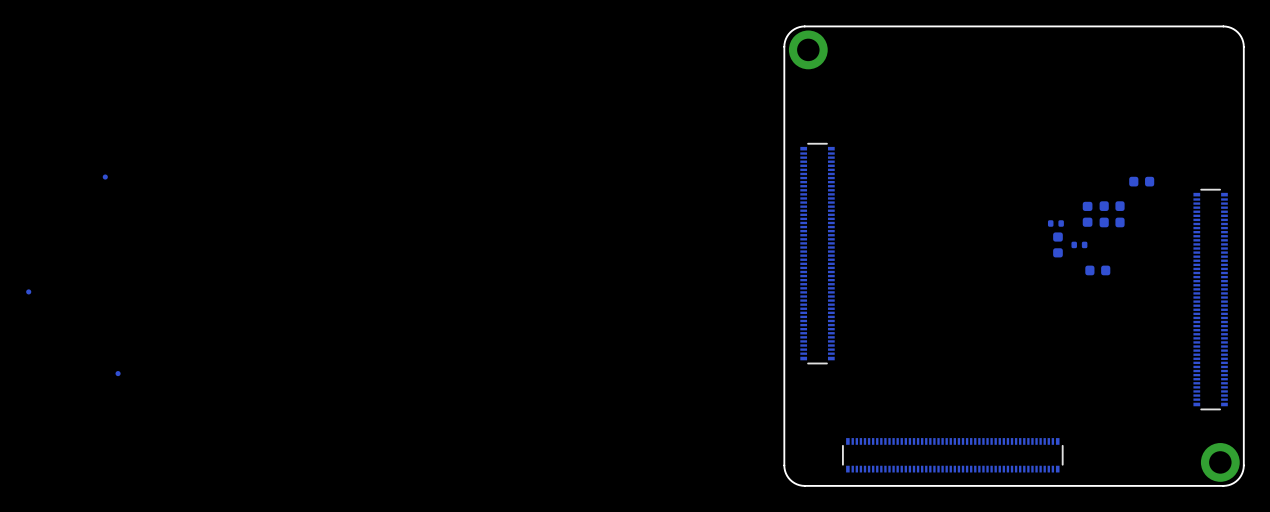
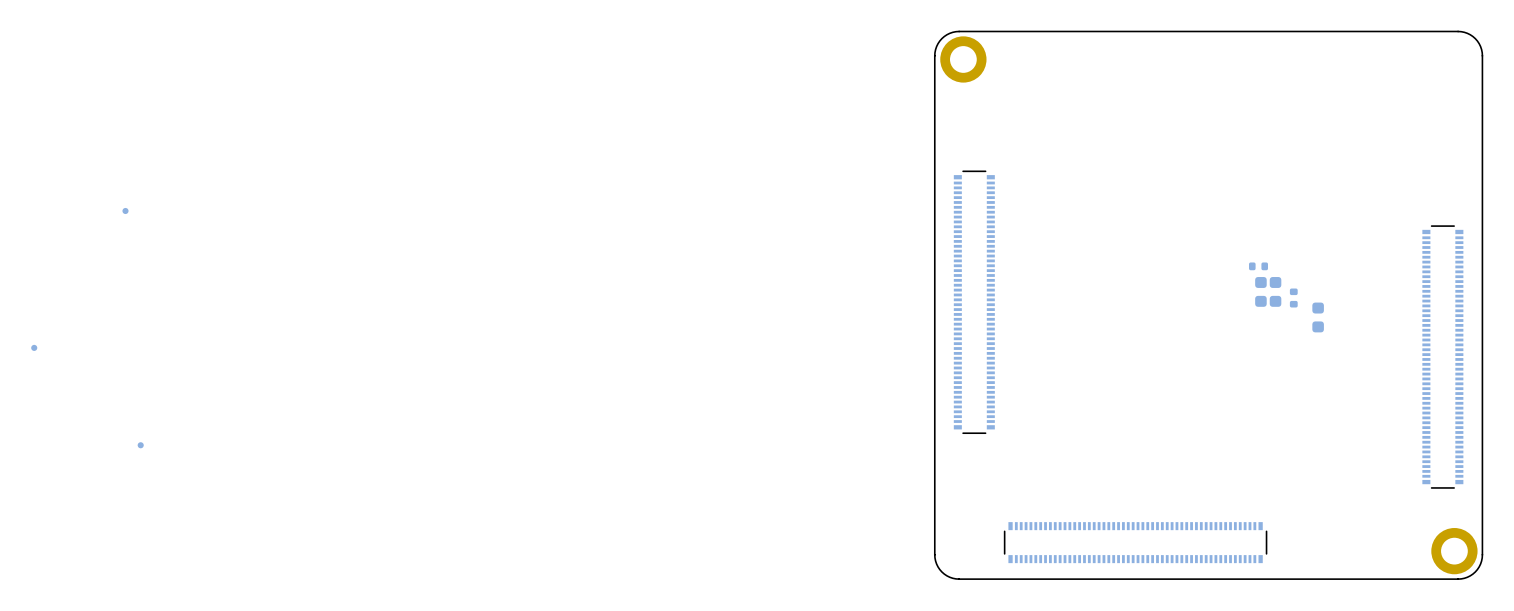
part: (1141, 181) -> none
part: (1112, 206) -> none
part: (1087, 214) -> none
part: (1112, 222) -> none
part: none -> (1275, 291)
part rotation: 0° (1079, 244) -> 90° clockwise (1293, 298)
part rotation: 0° (1097, 270) -> 90° clockwise (1318, 317)

